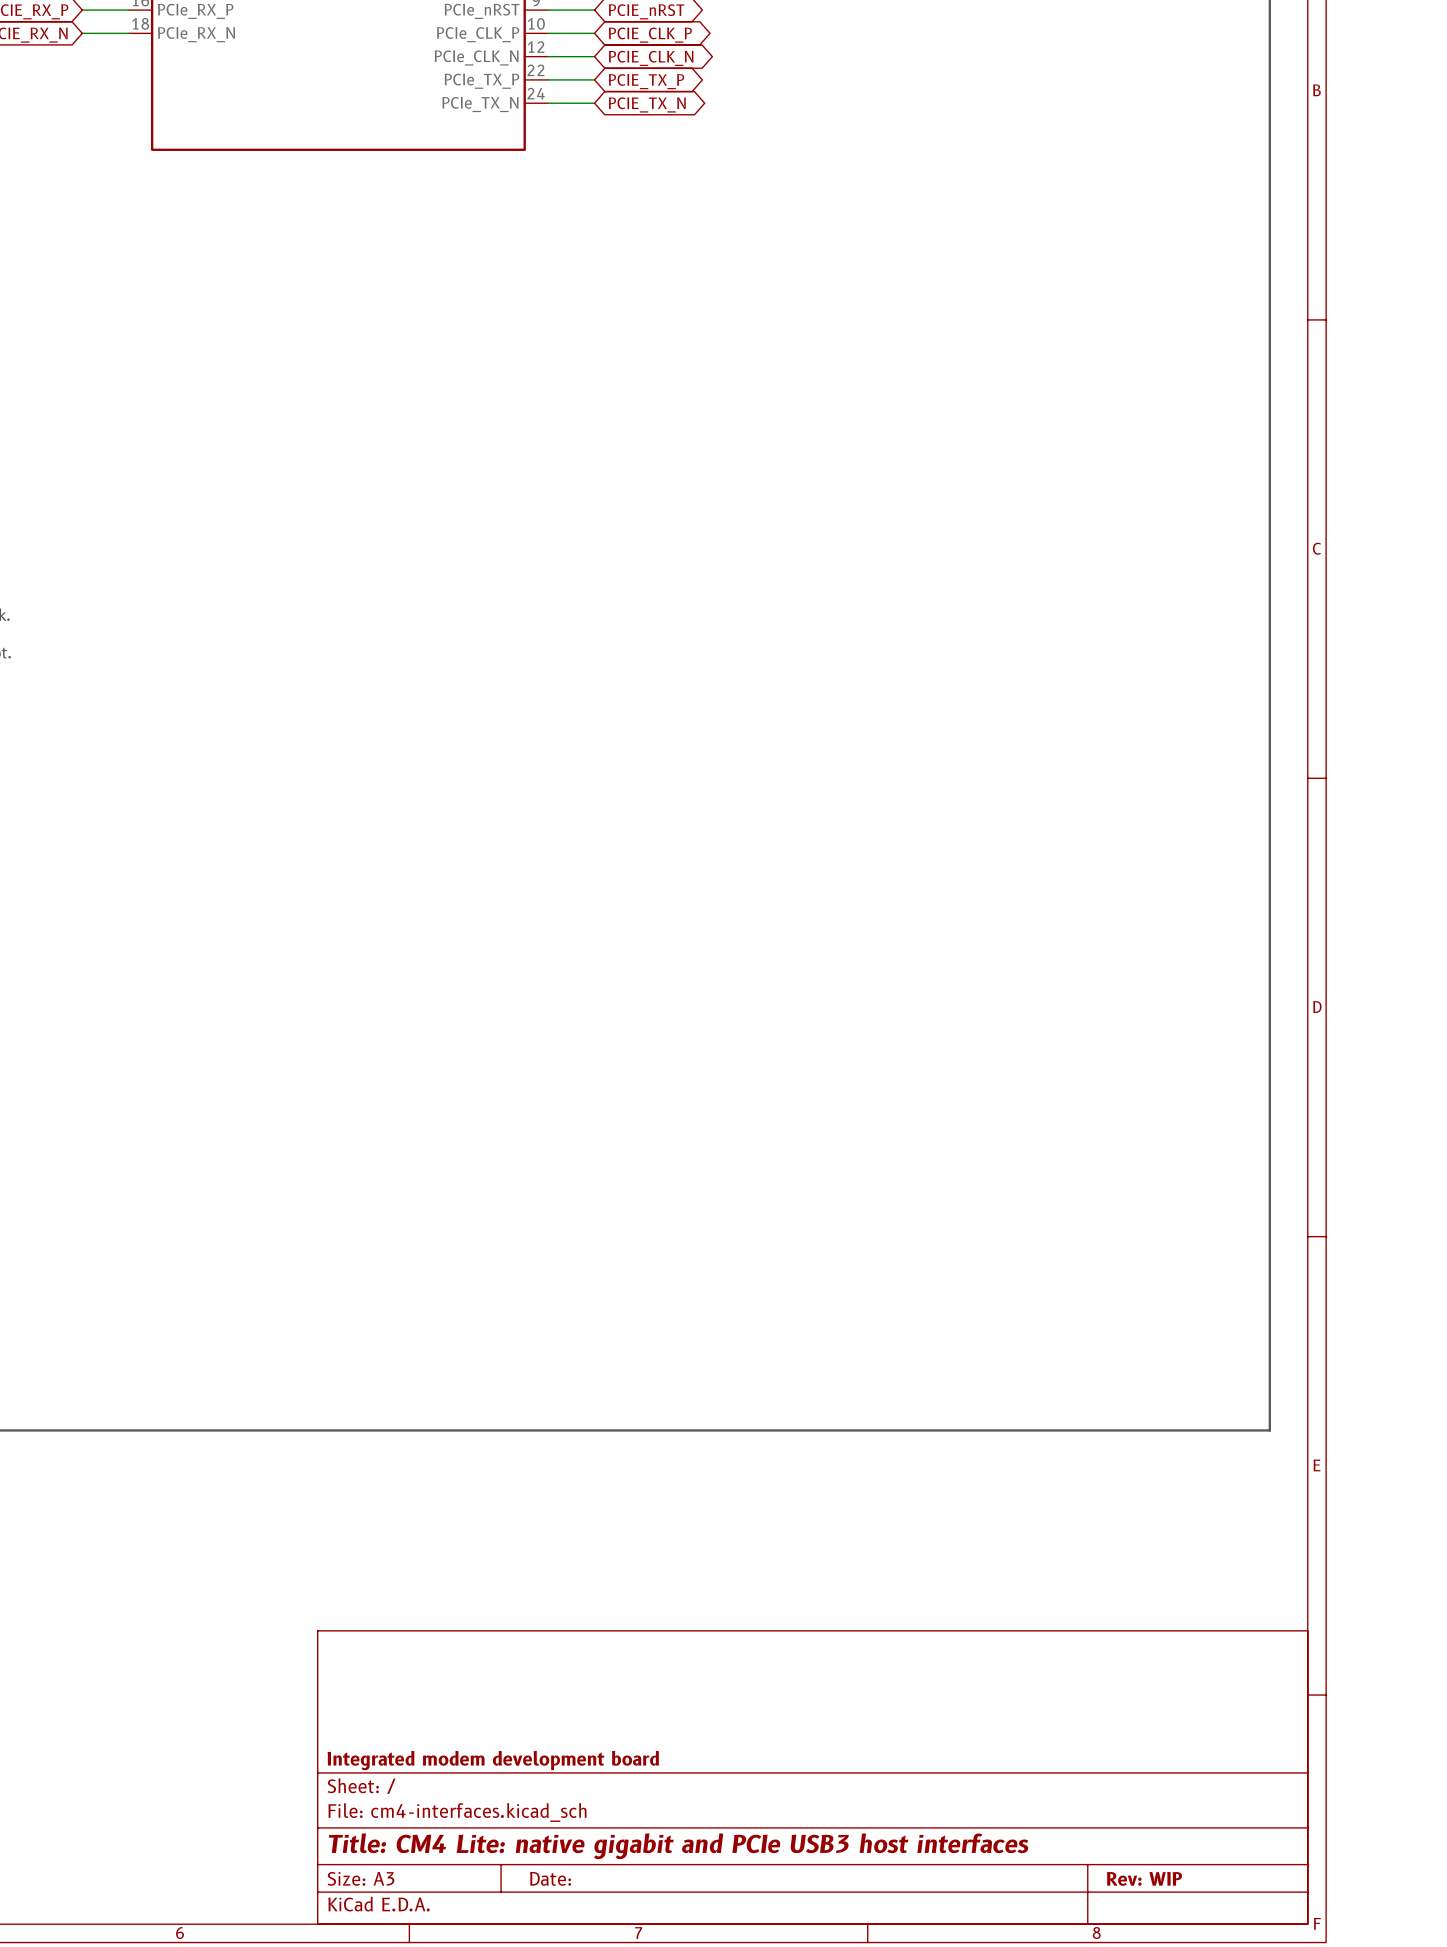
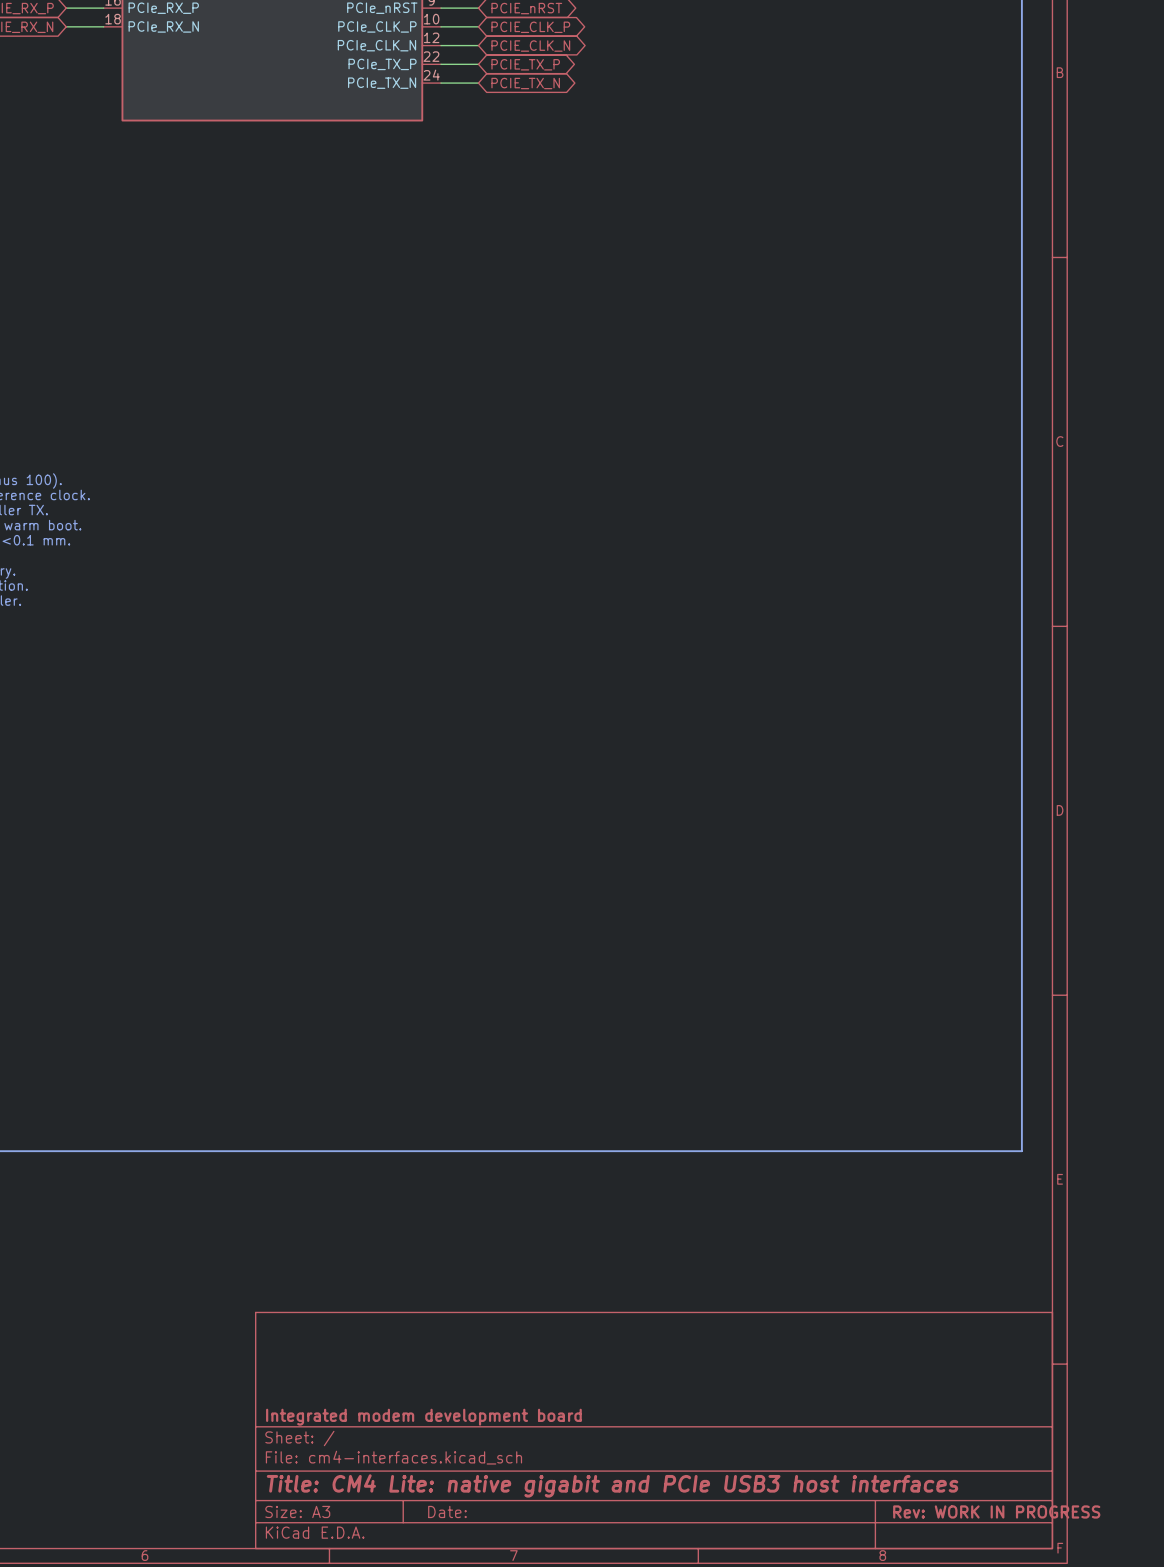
title block: Rev: WIP (1144, 1878) -> Rev: WORK IN PROGRESS (996, 1511)

